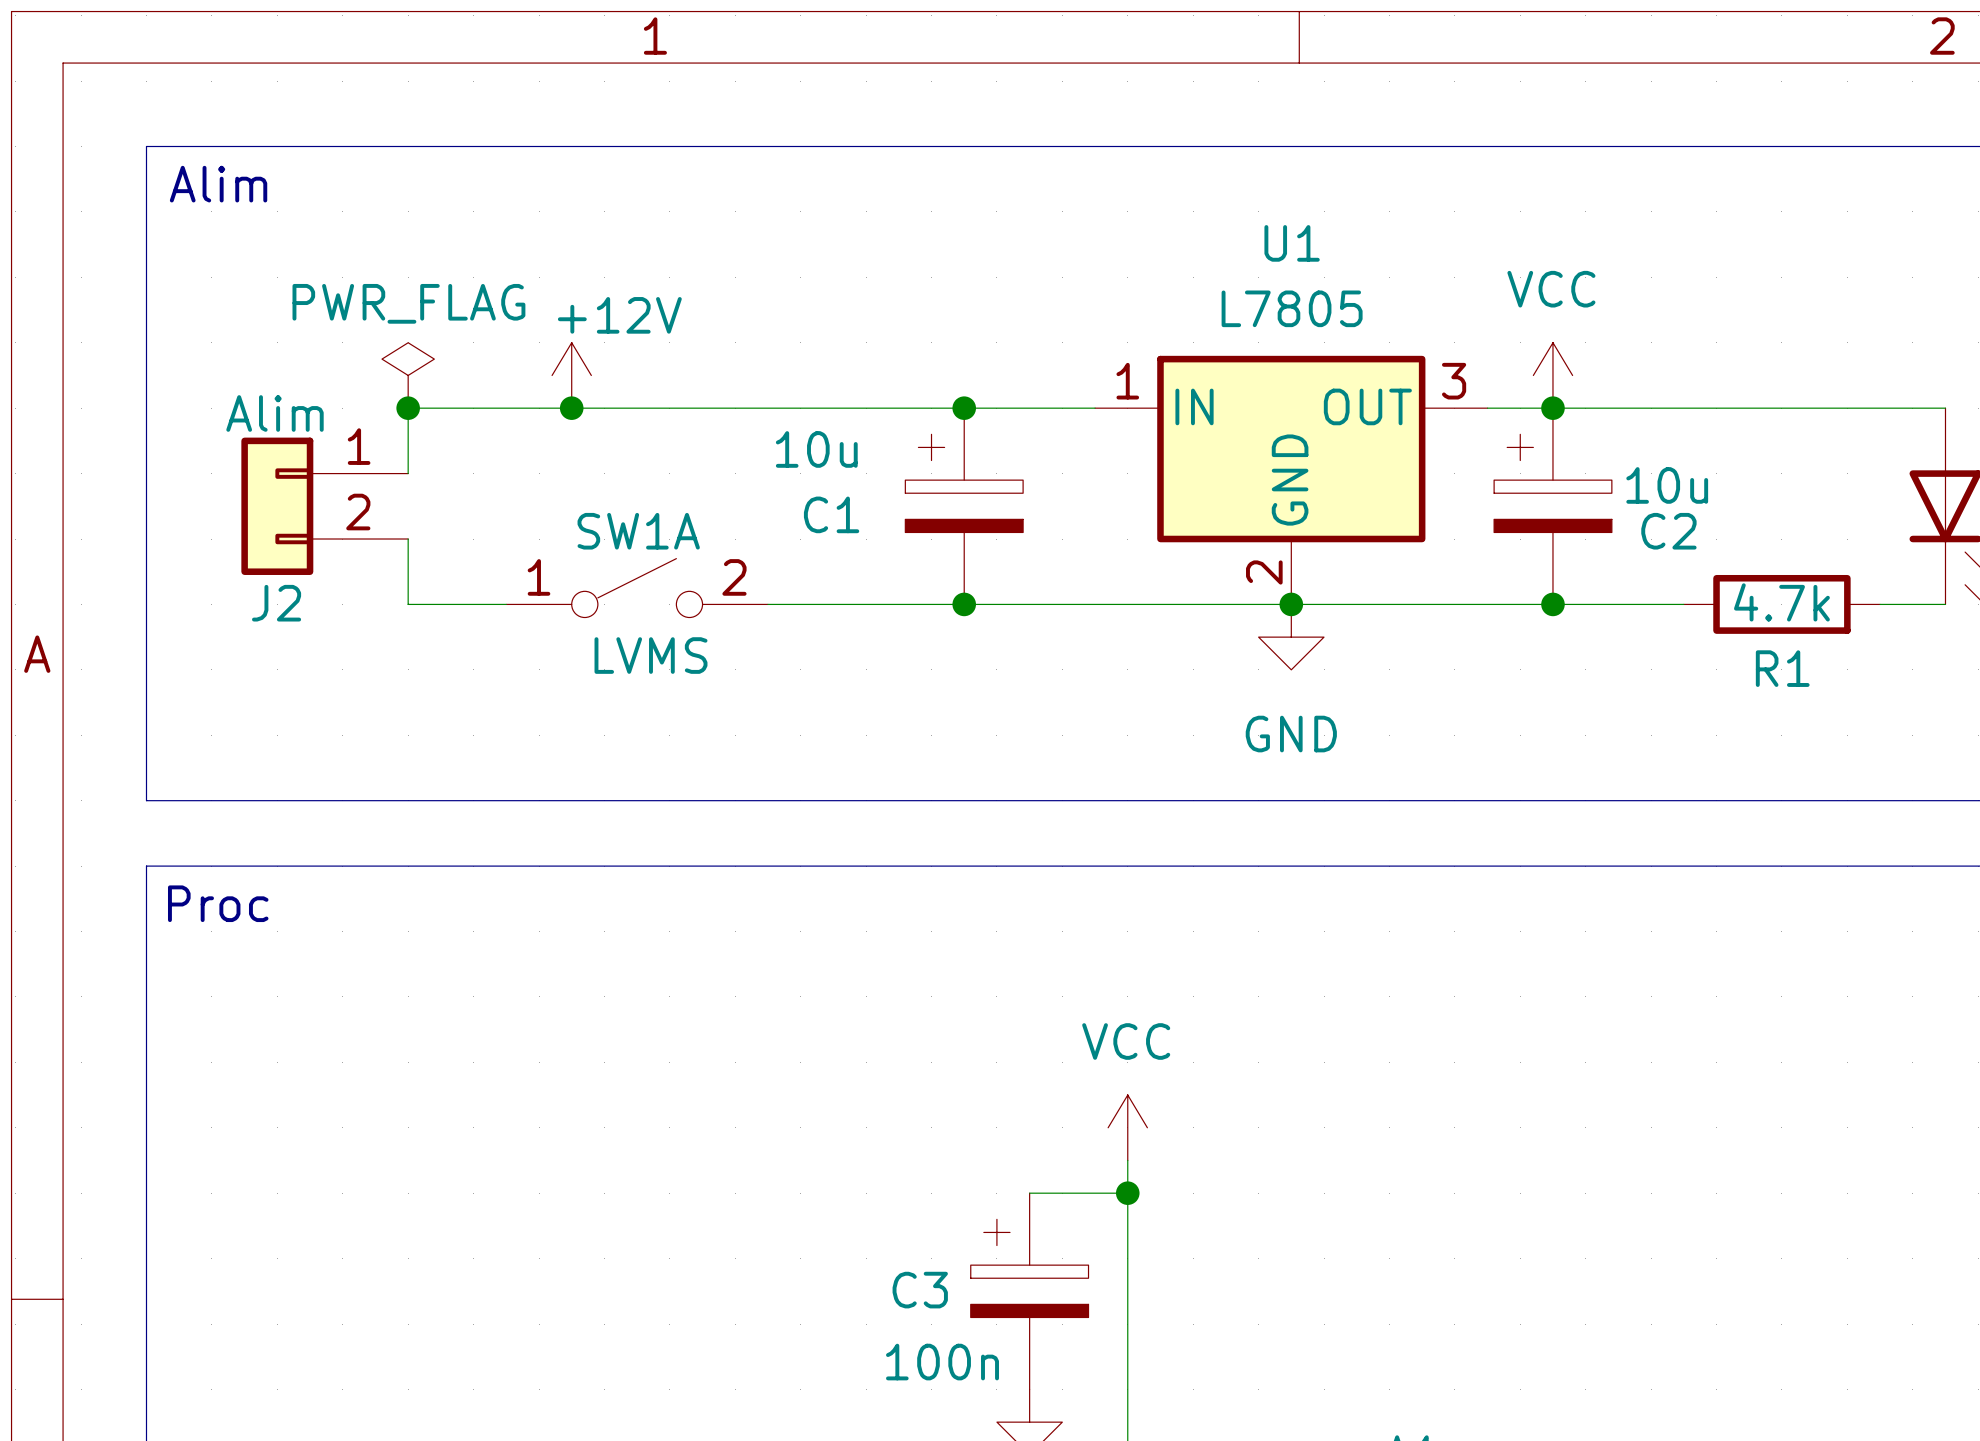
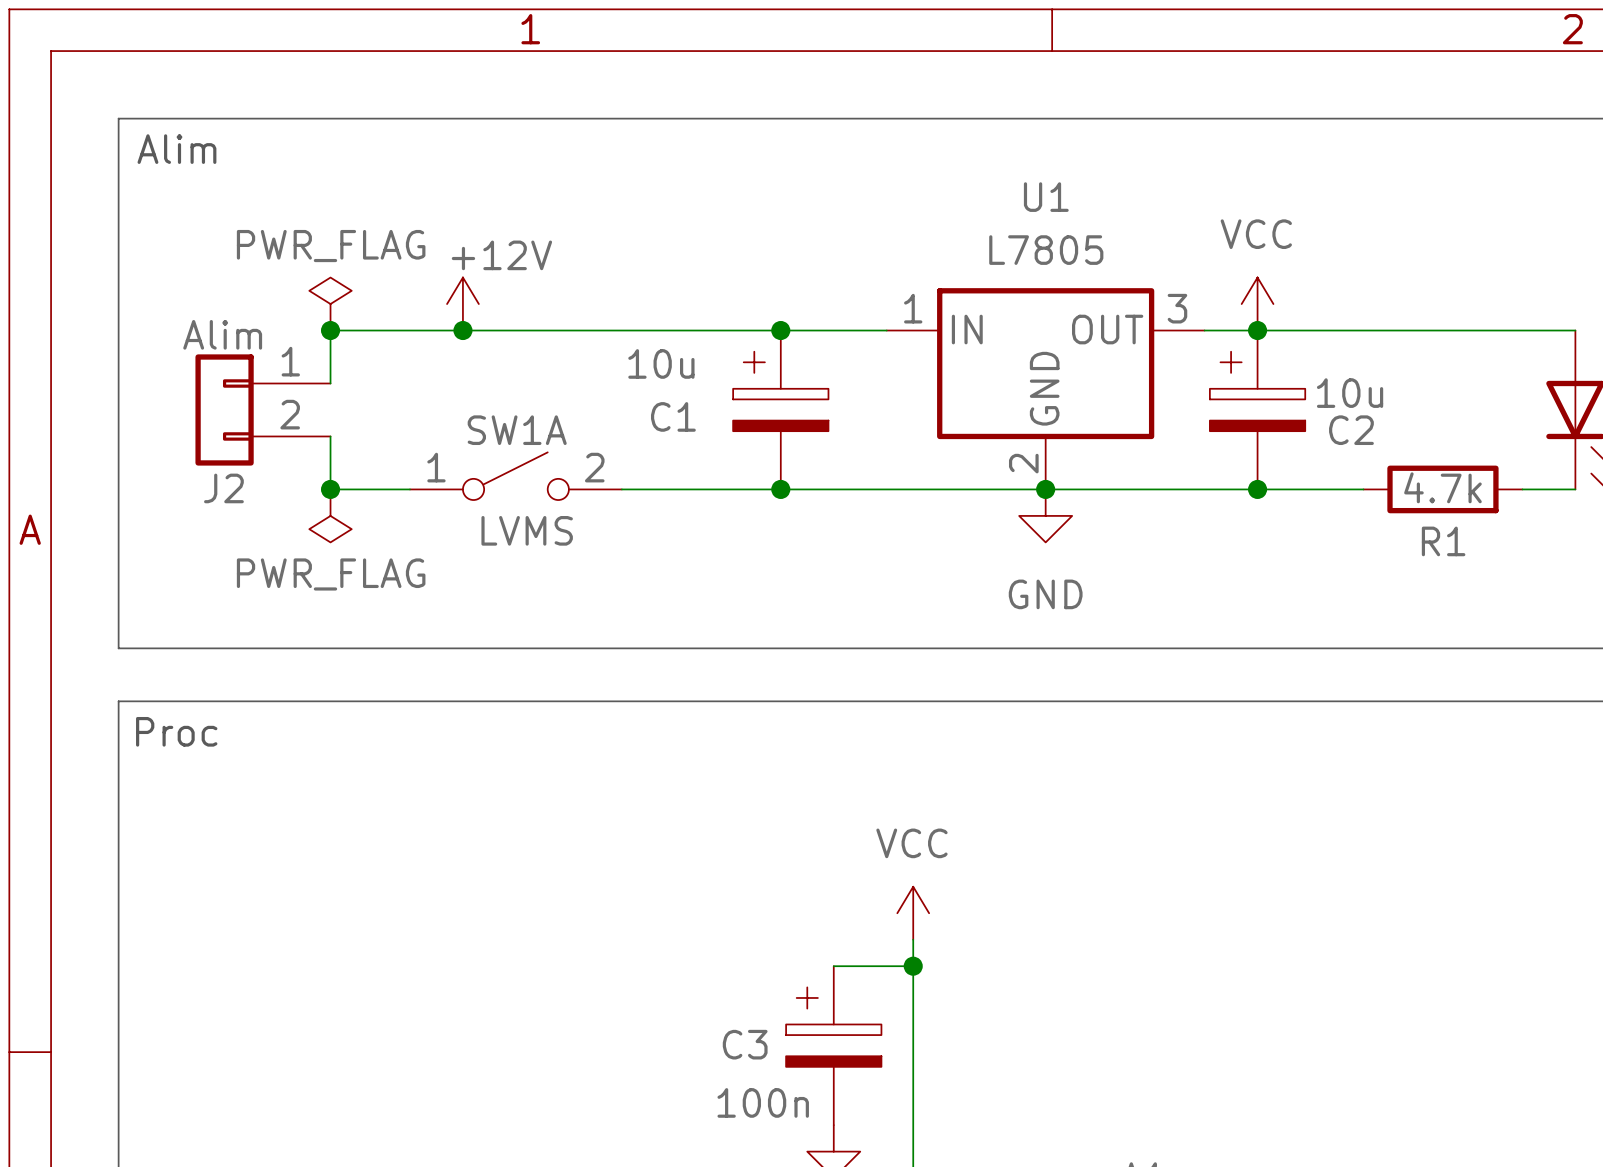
junction: none -> (330, 489)
power symbol: none -> PWR_FLAG (330, 515)

